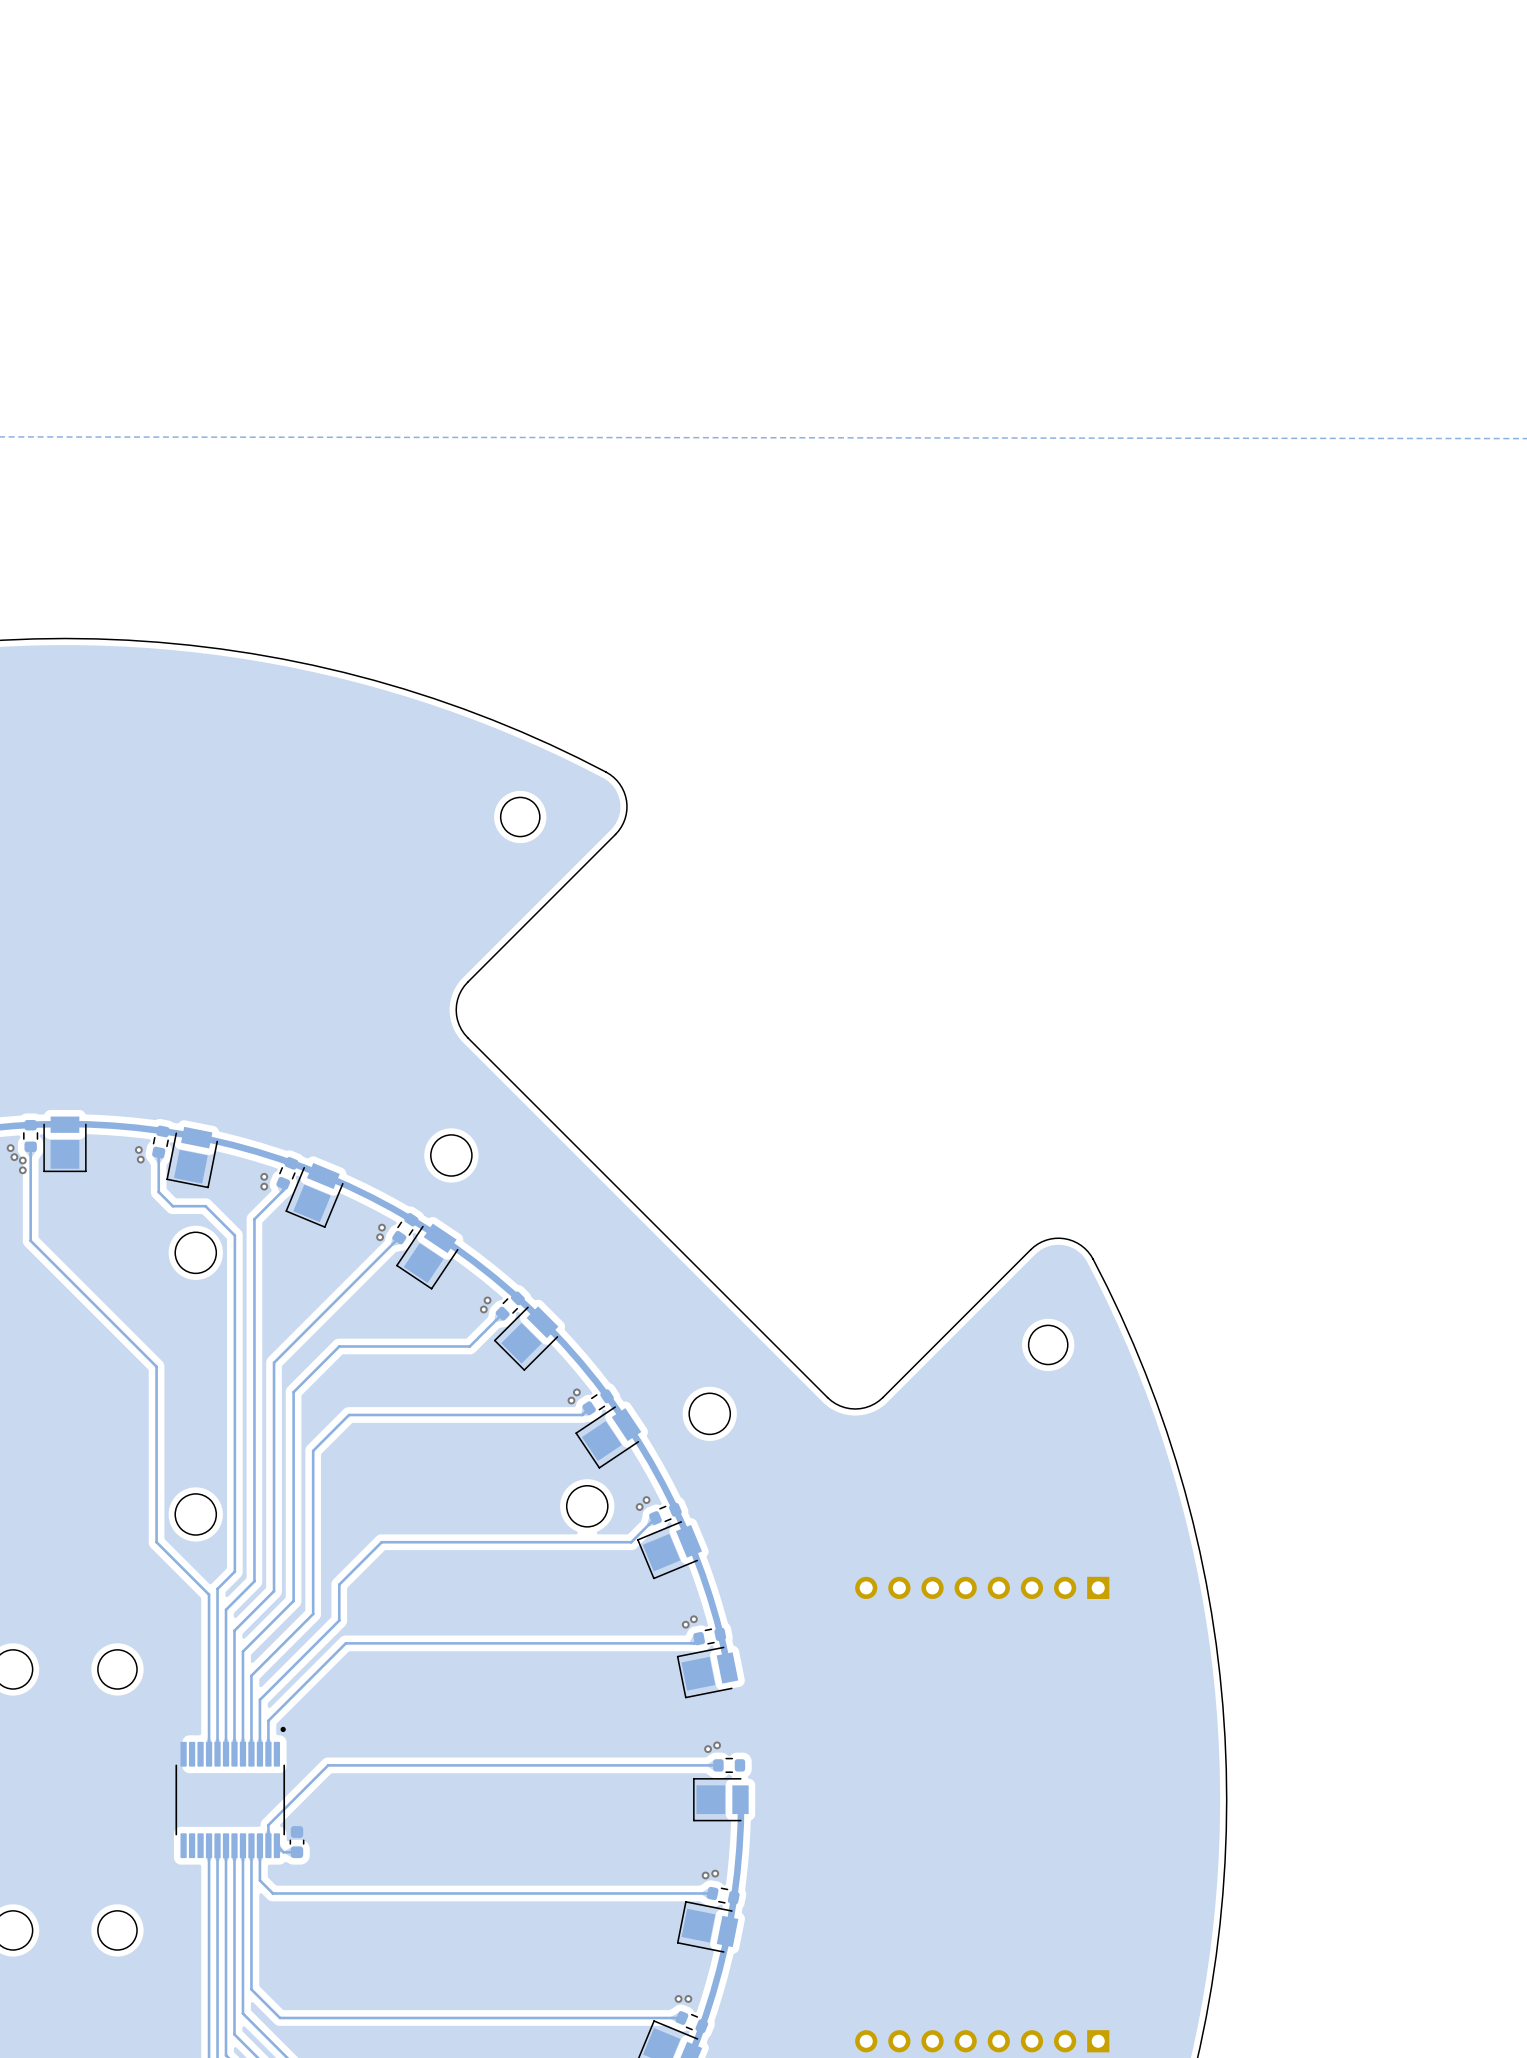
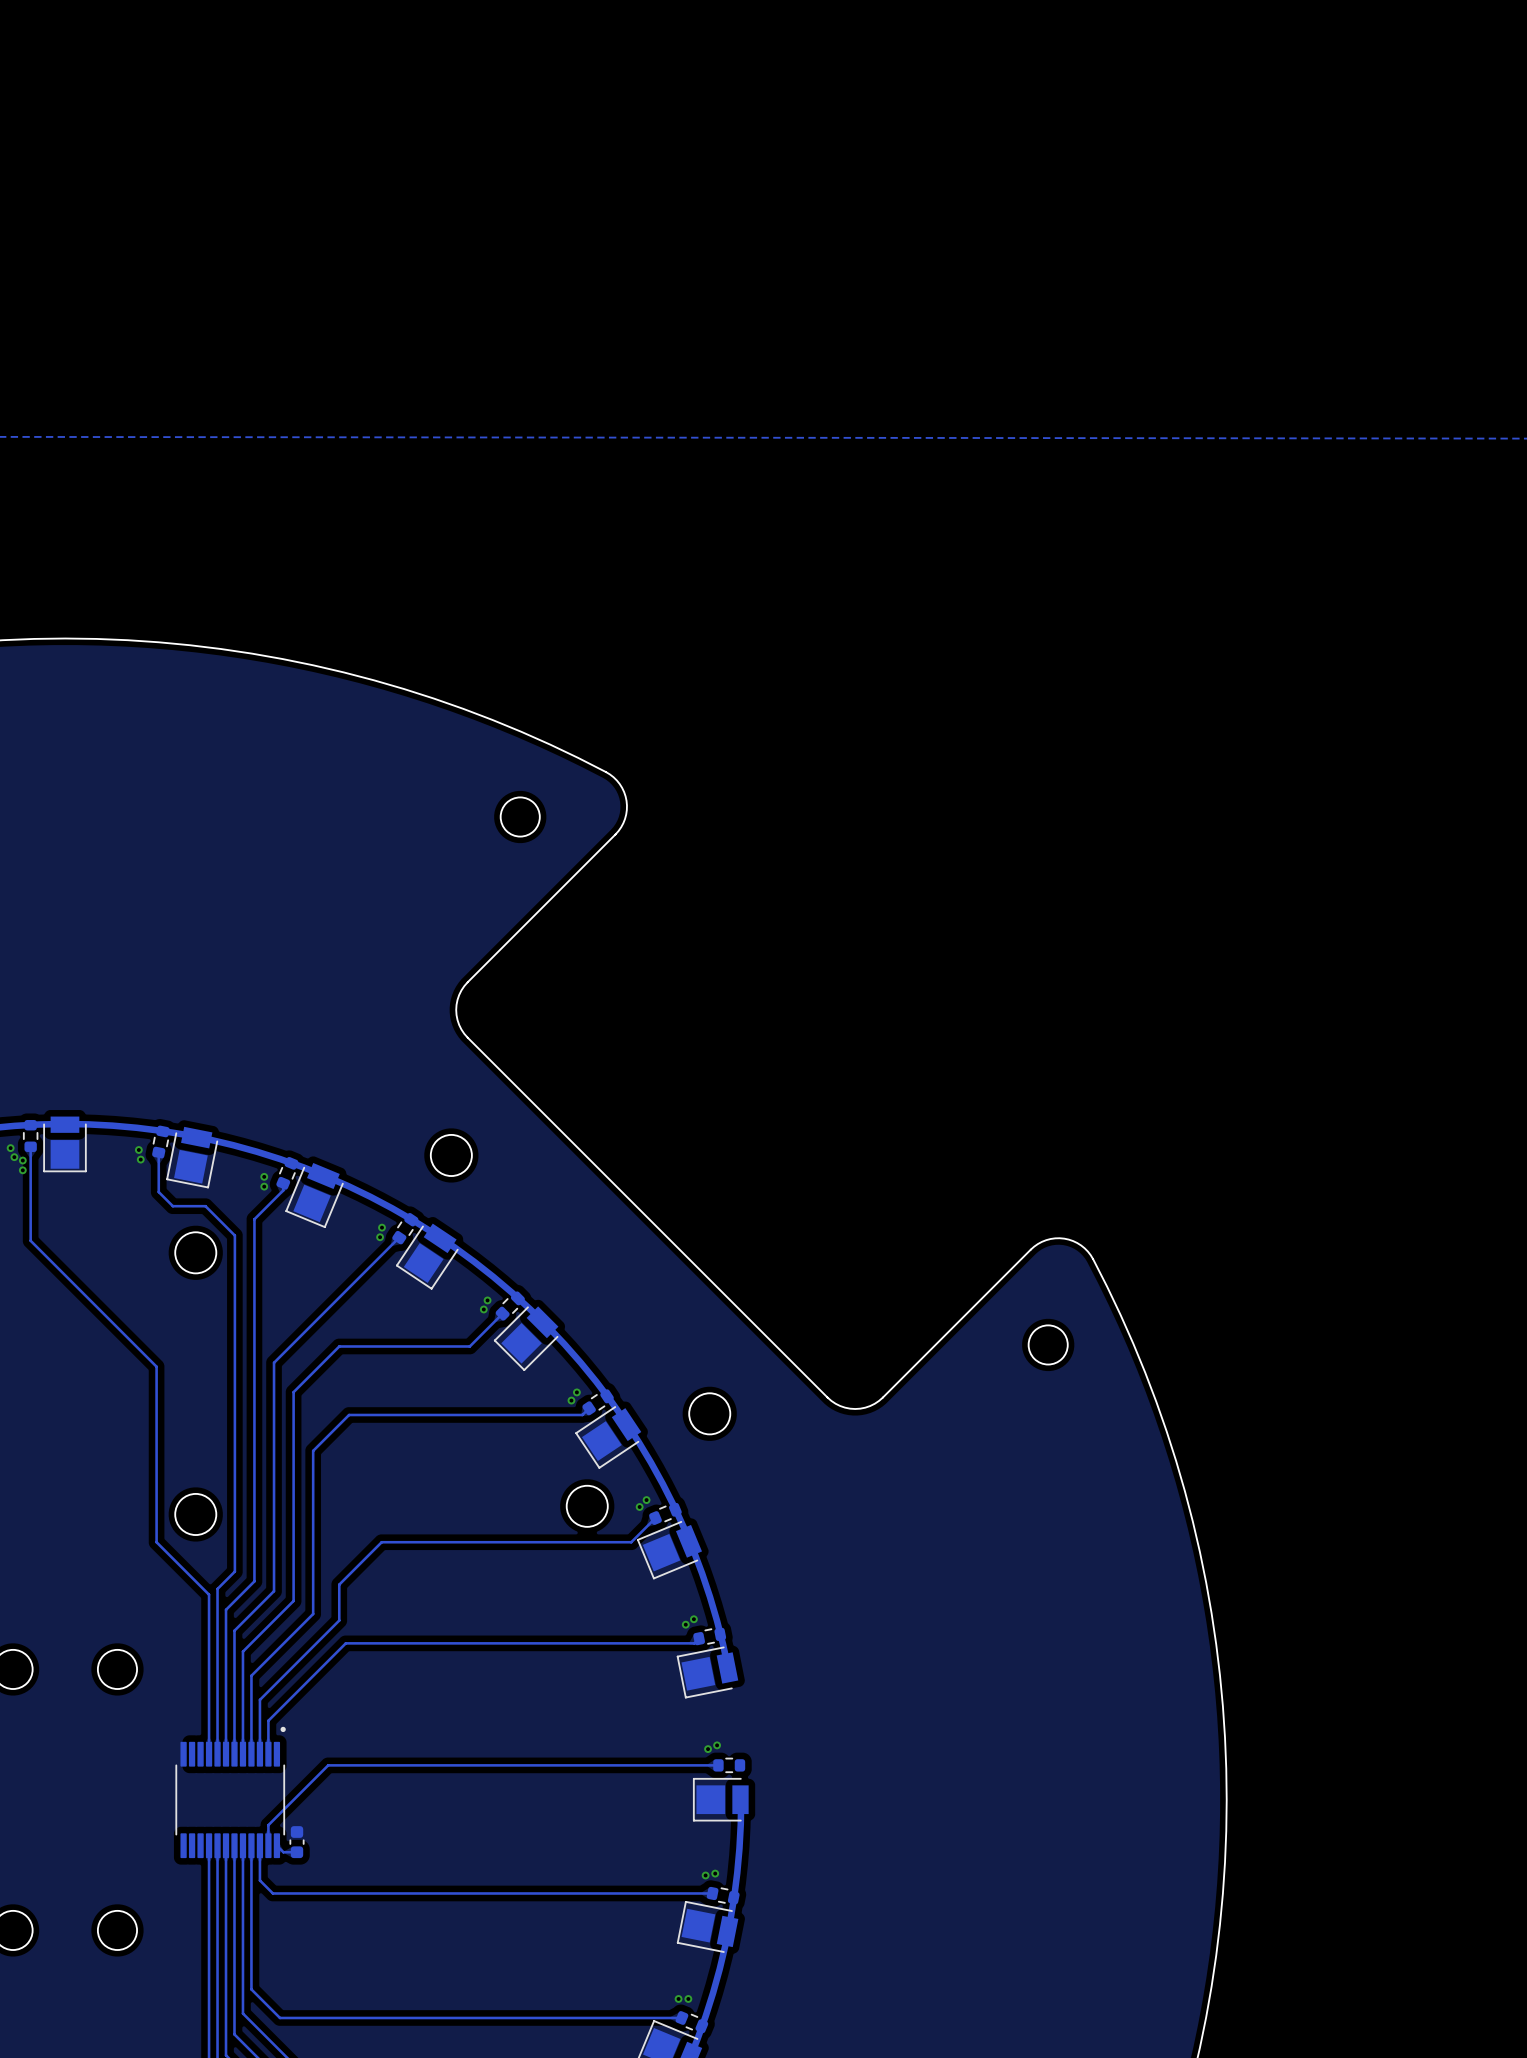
part: (982, 1587) -> none
part: (982, 2041) -> none

